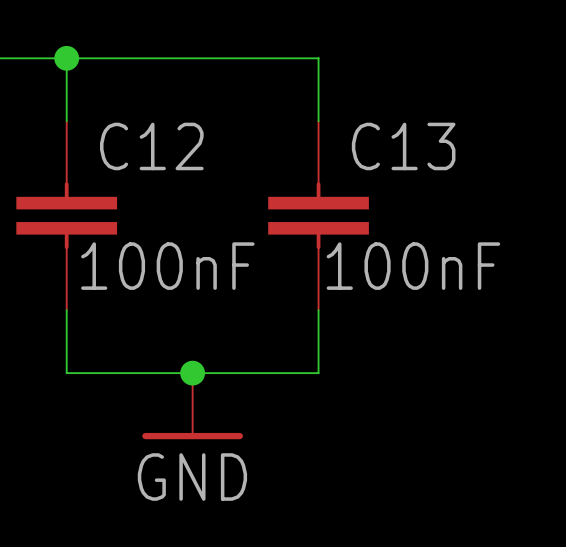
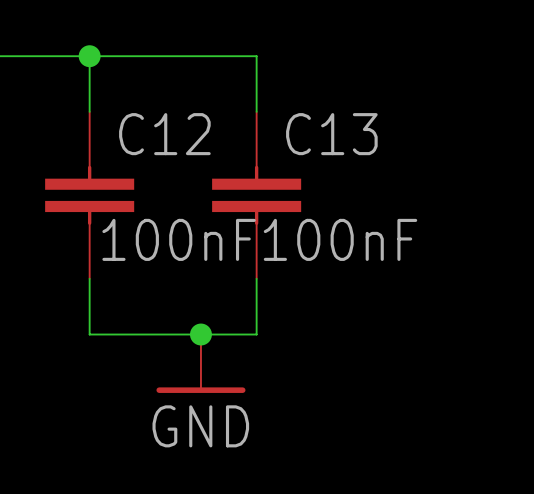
wire: (255, 58) (318, 58) (318, 121) -> (256, 56) (256, 111)
C13 position: (318, 215) -> (256, 195)
wire: (318, 310) (318, 373) (255, 373) -> (256, 278) (256, 334)

